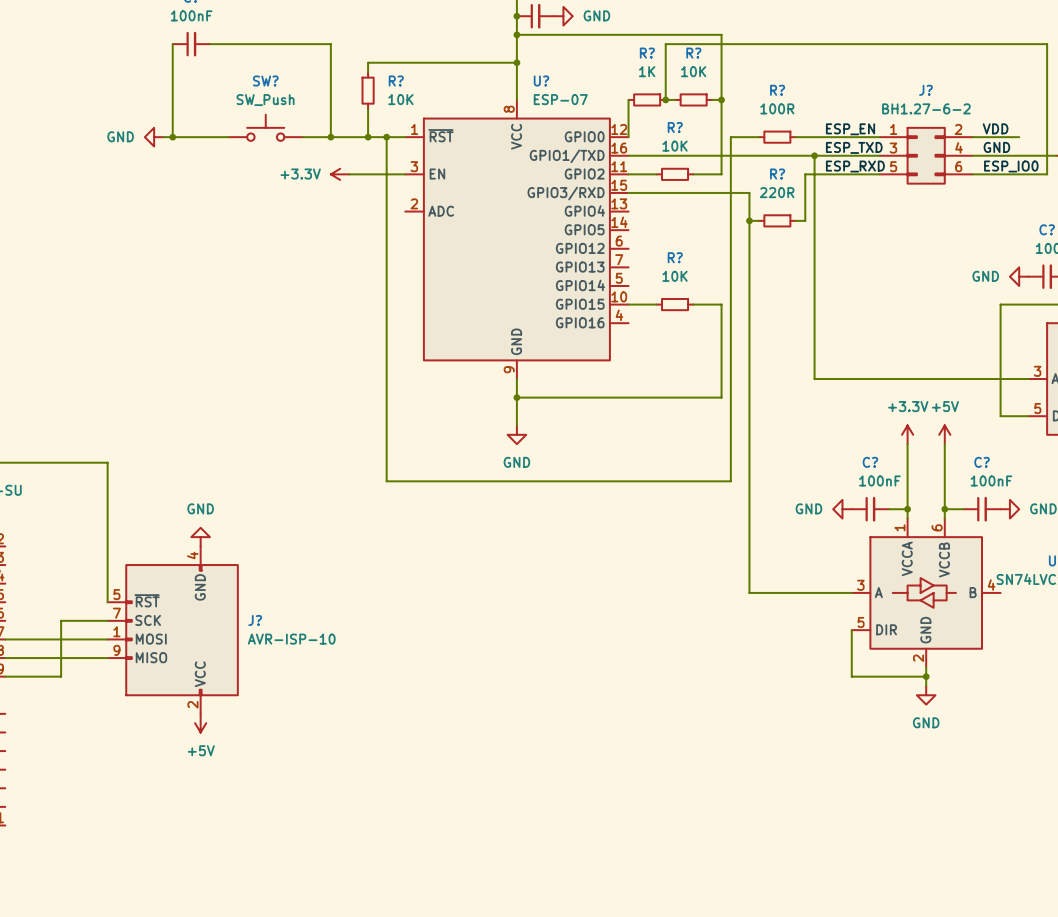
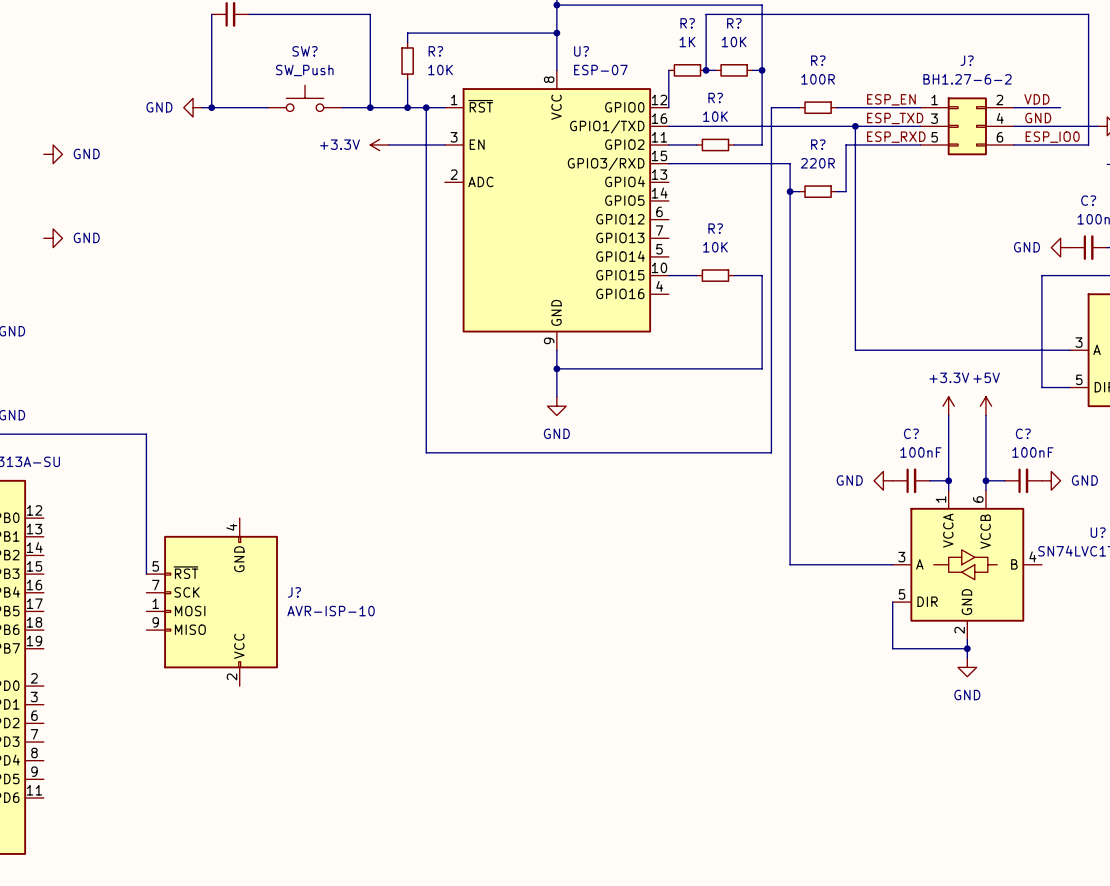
power symbol: none -> GND (53, 154)
power symbol: none -> GND (53, 238)
power symbol: GND (200, 537) -> none
wire: (107, 620) (61, 620) (61, 676) (5, 676) -> none
wire: (5, 639) (107, 639) -> none
wire: (5, 658) (107, 658) -> none
power symbol: +5V (200, 723) -> none

